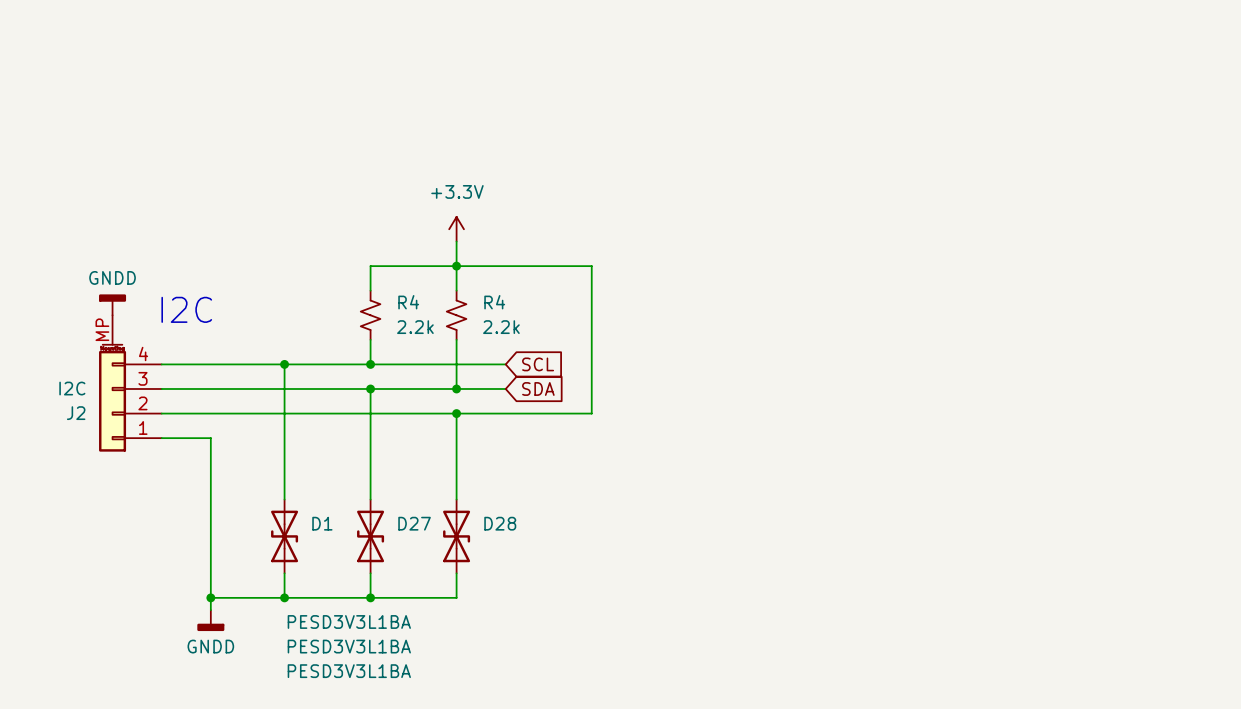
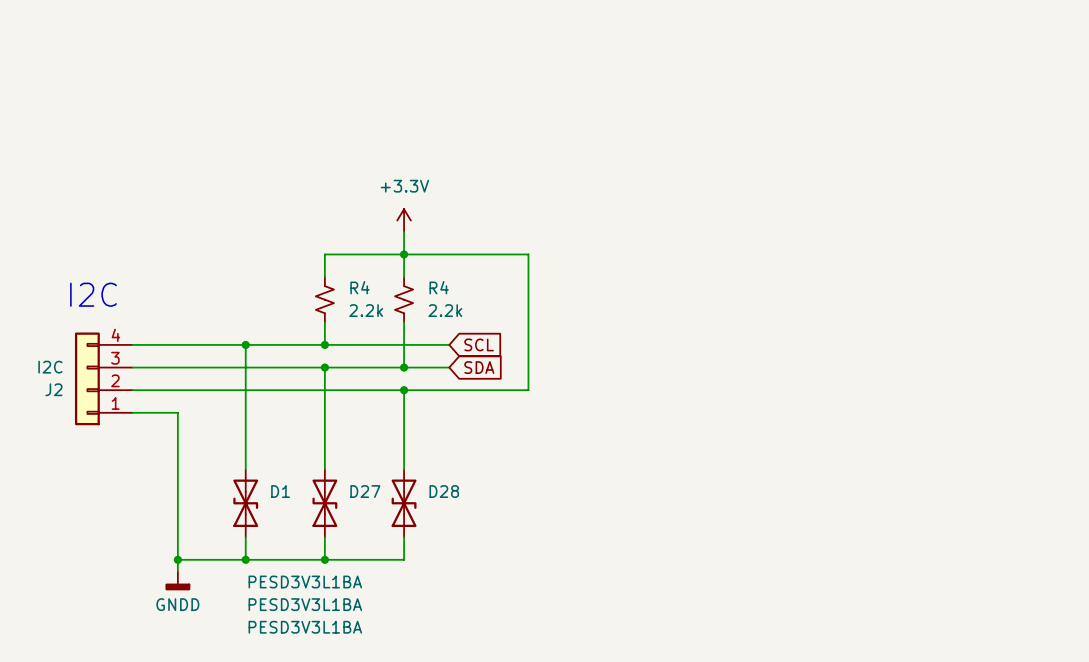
power symbol: GNDD (112, 304) -> none
text position: I2C (186, 309) -> I2C (93, 294)
J2 symbol: [99, 315, 162, 452] -> [74, 332, 133, 426]

